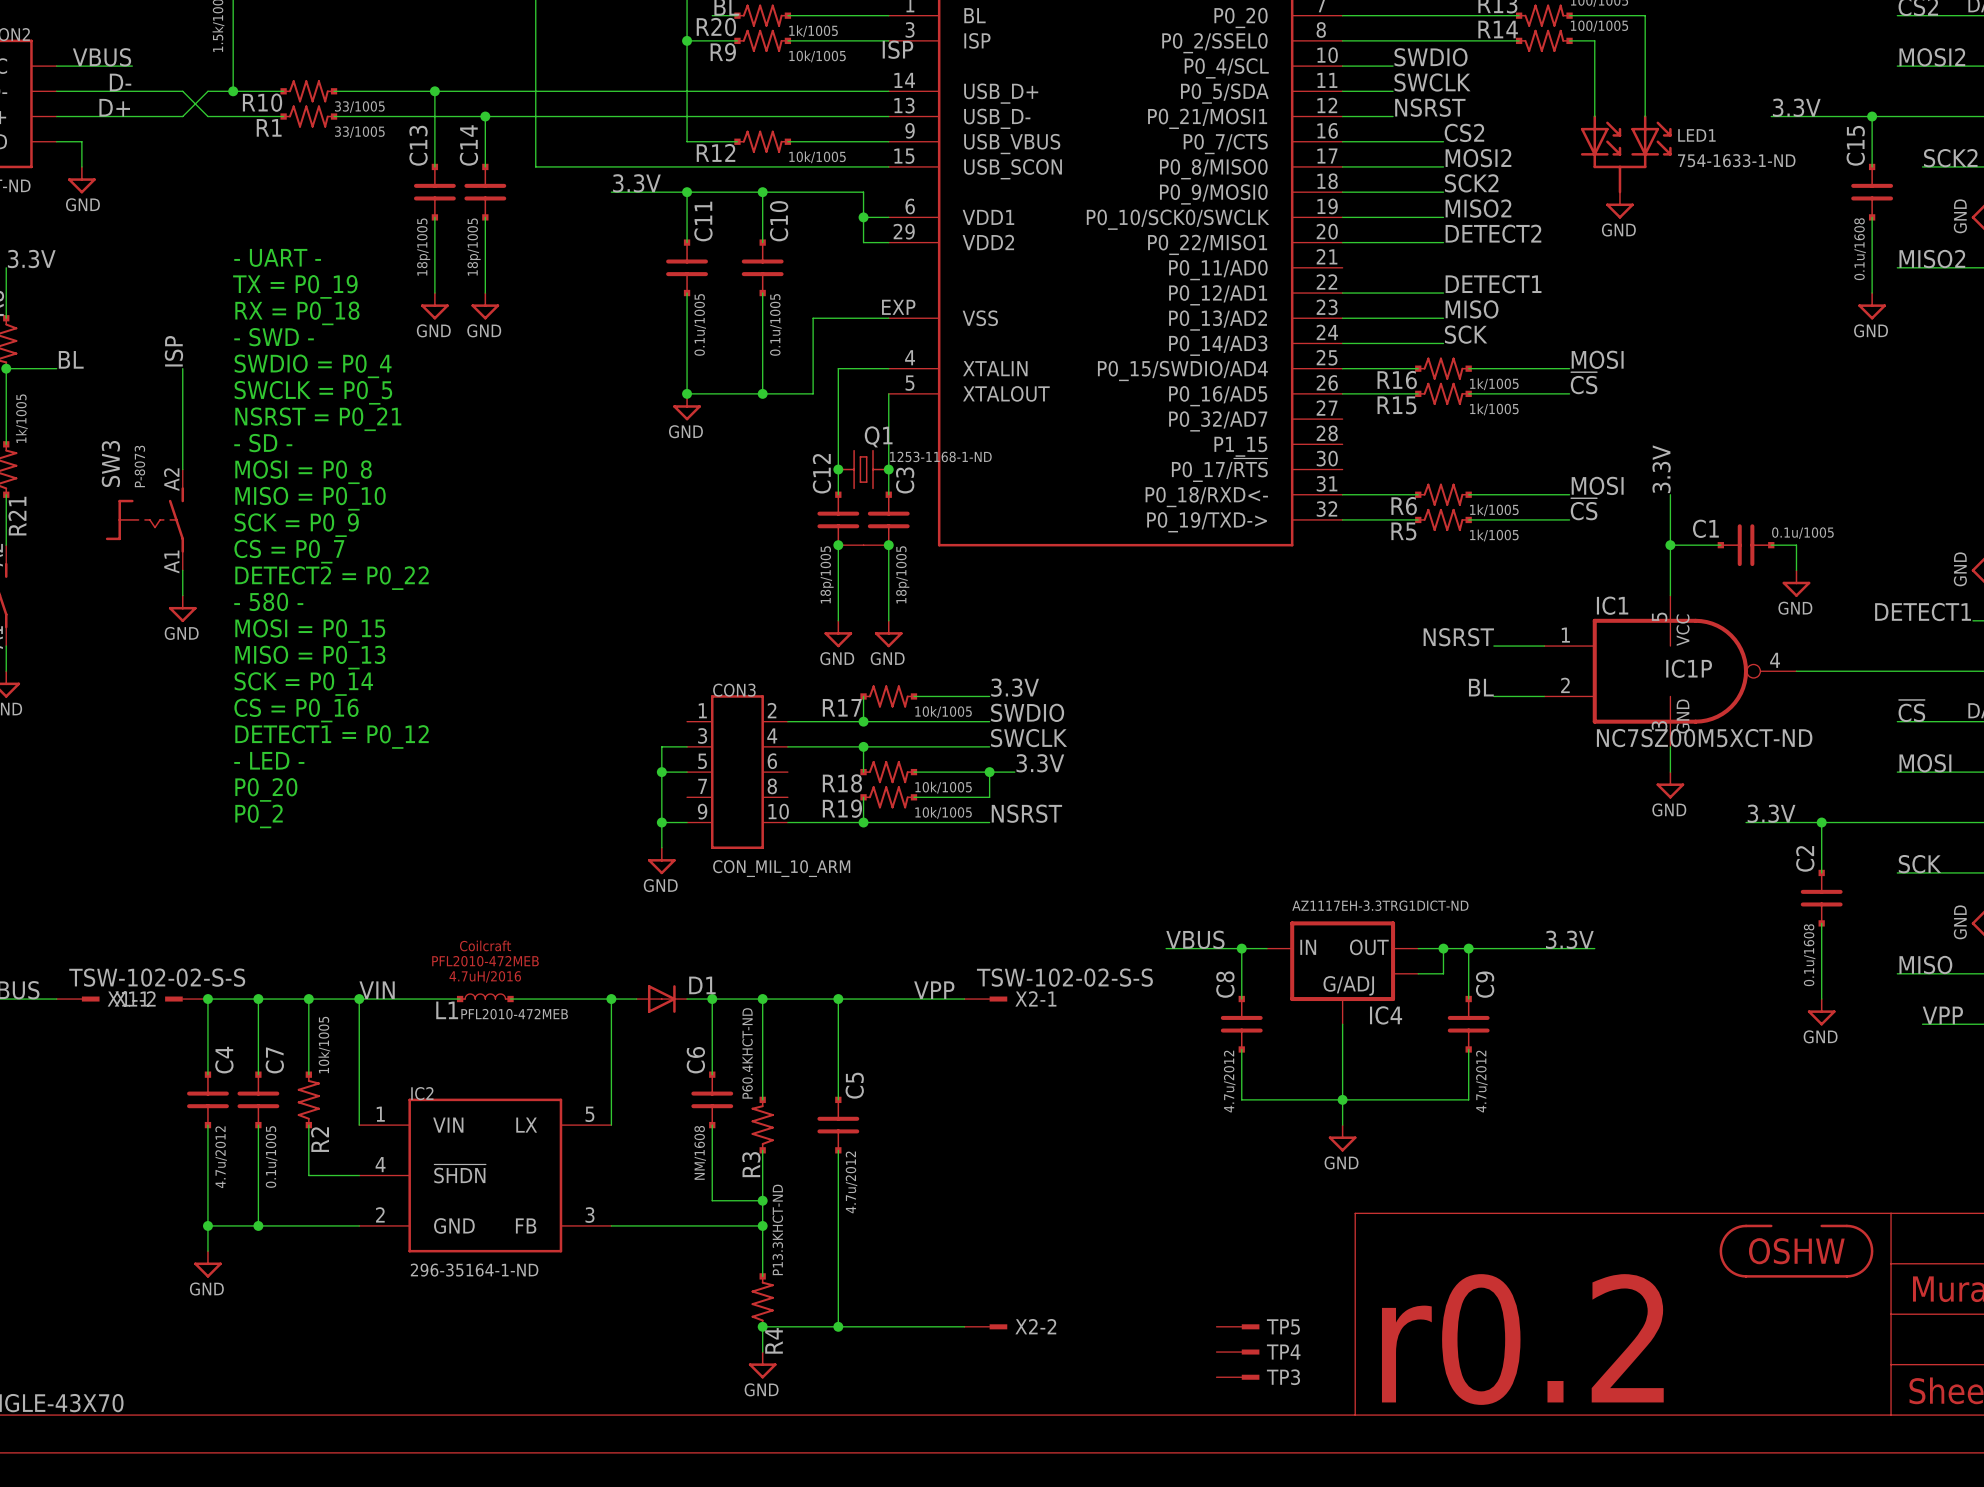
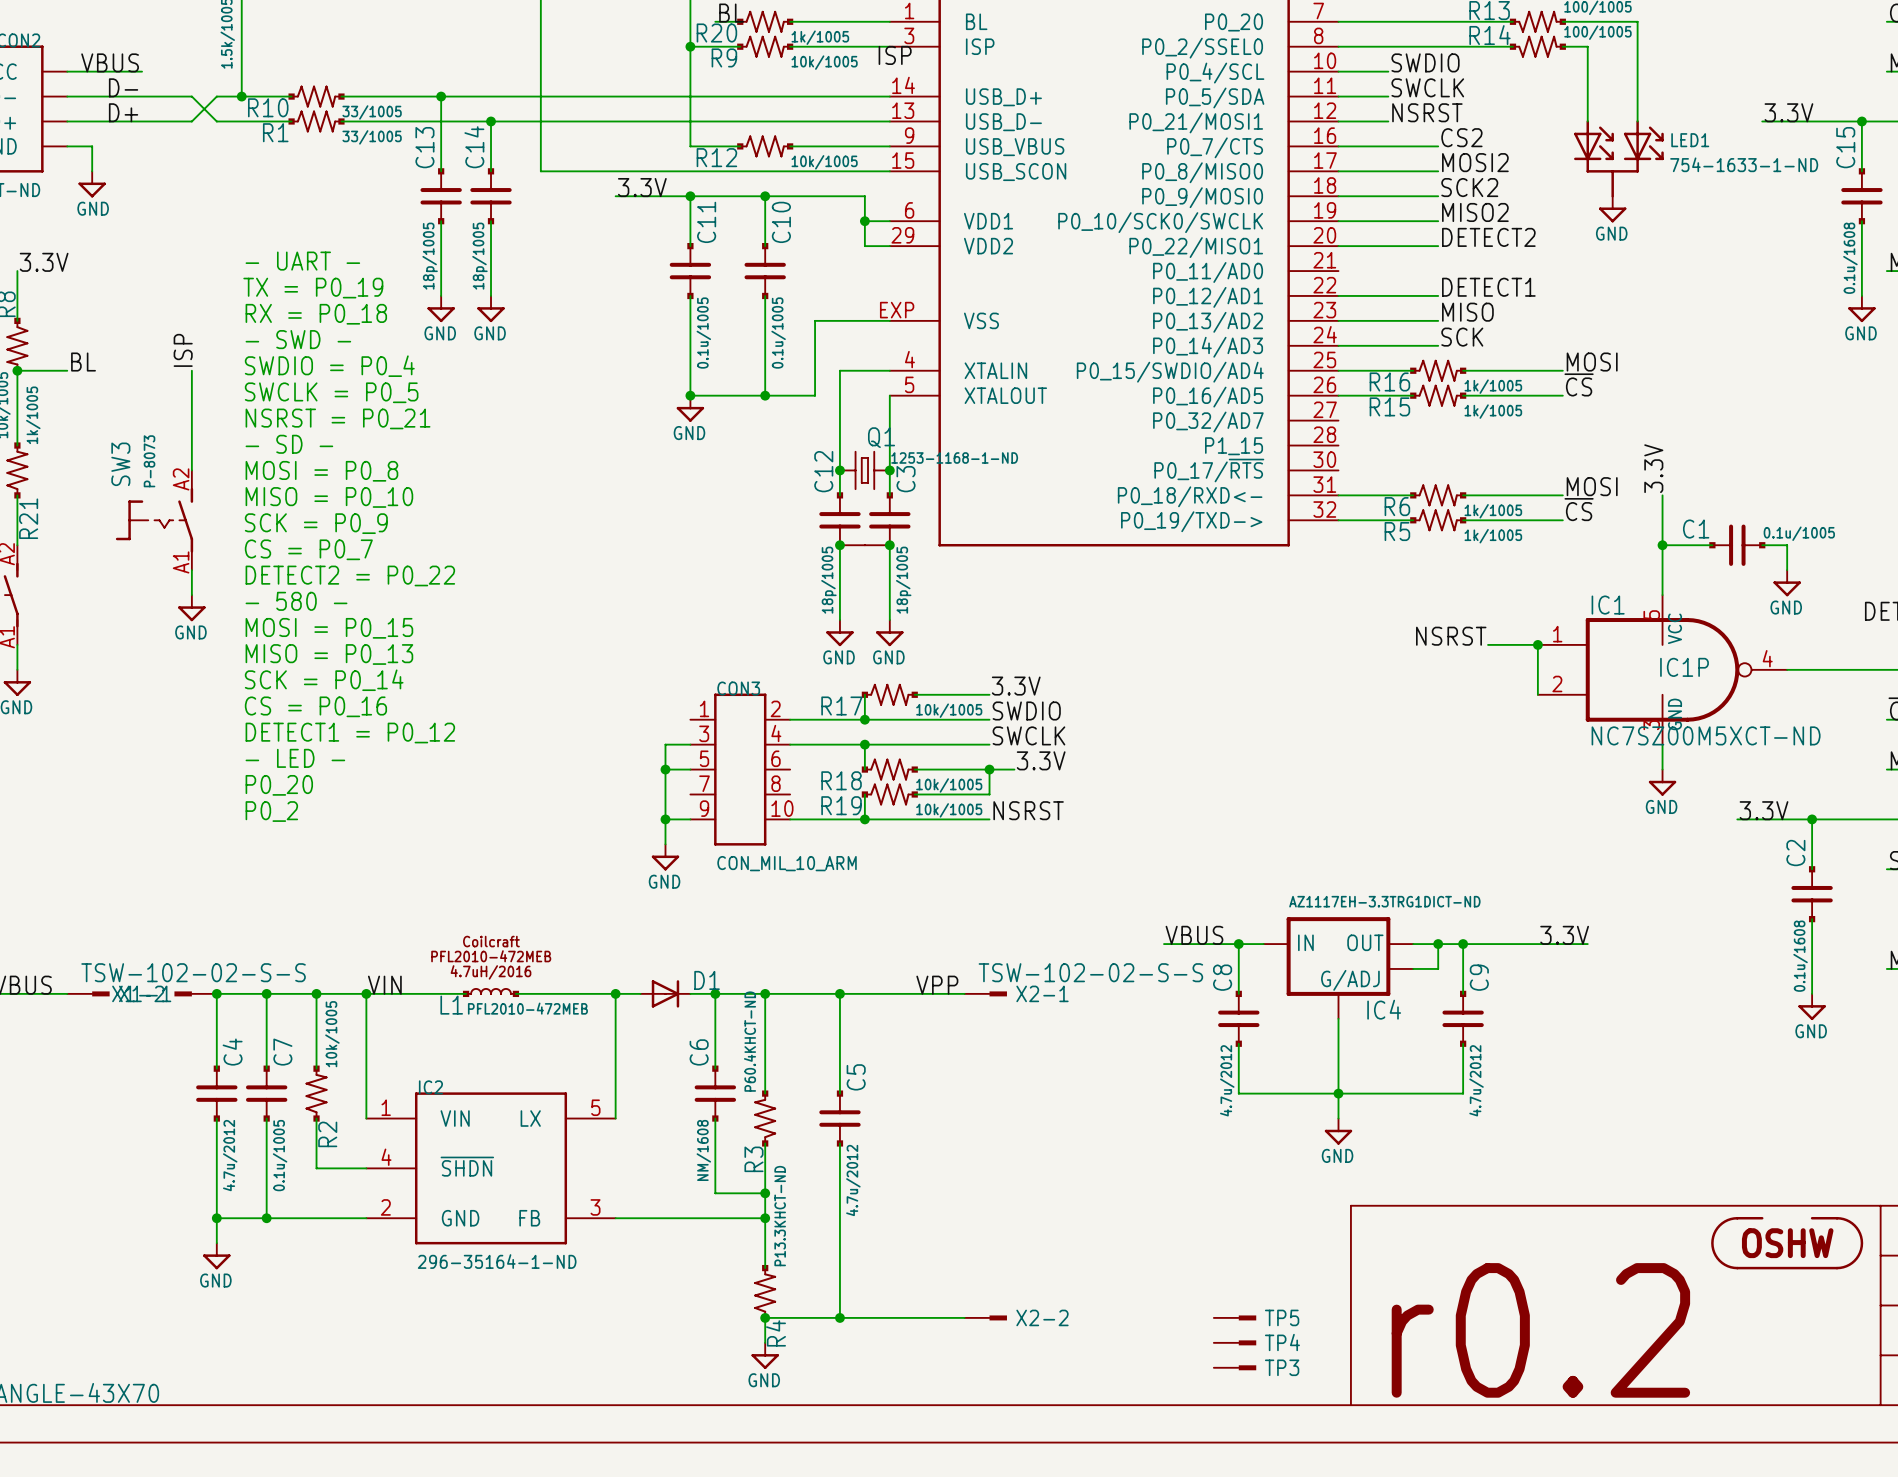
junction: none -> (1537, 644)
label: BL (1481, 687) -> none
wire: (1493, 696) (1544, 696) -> (1537, 644) (1537, 694)

